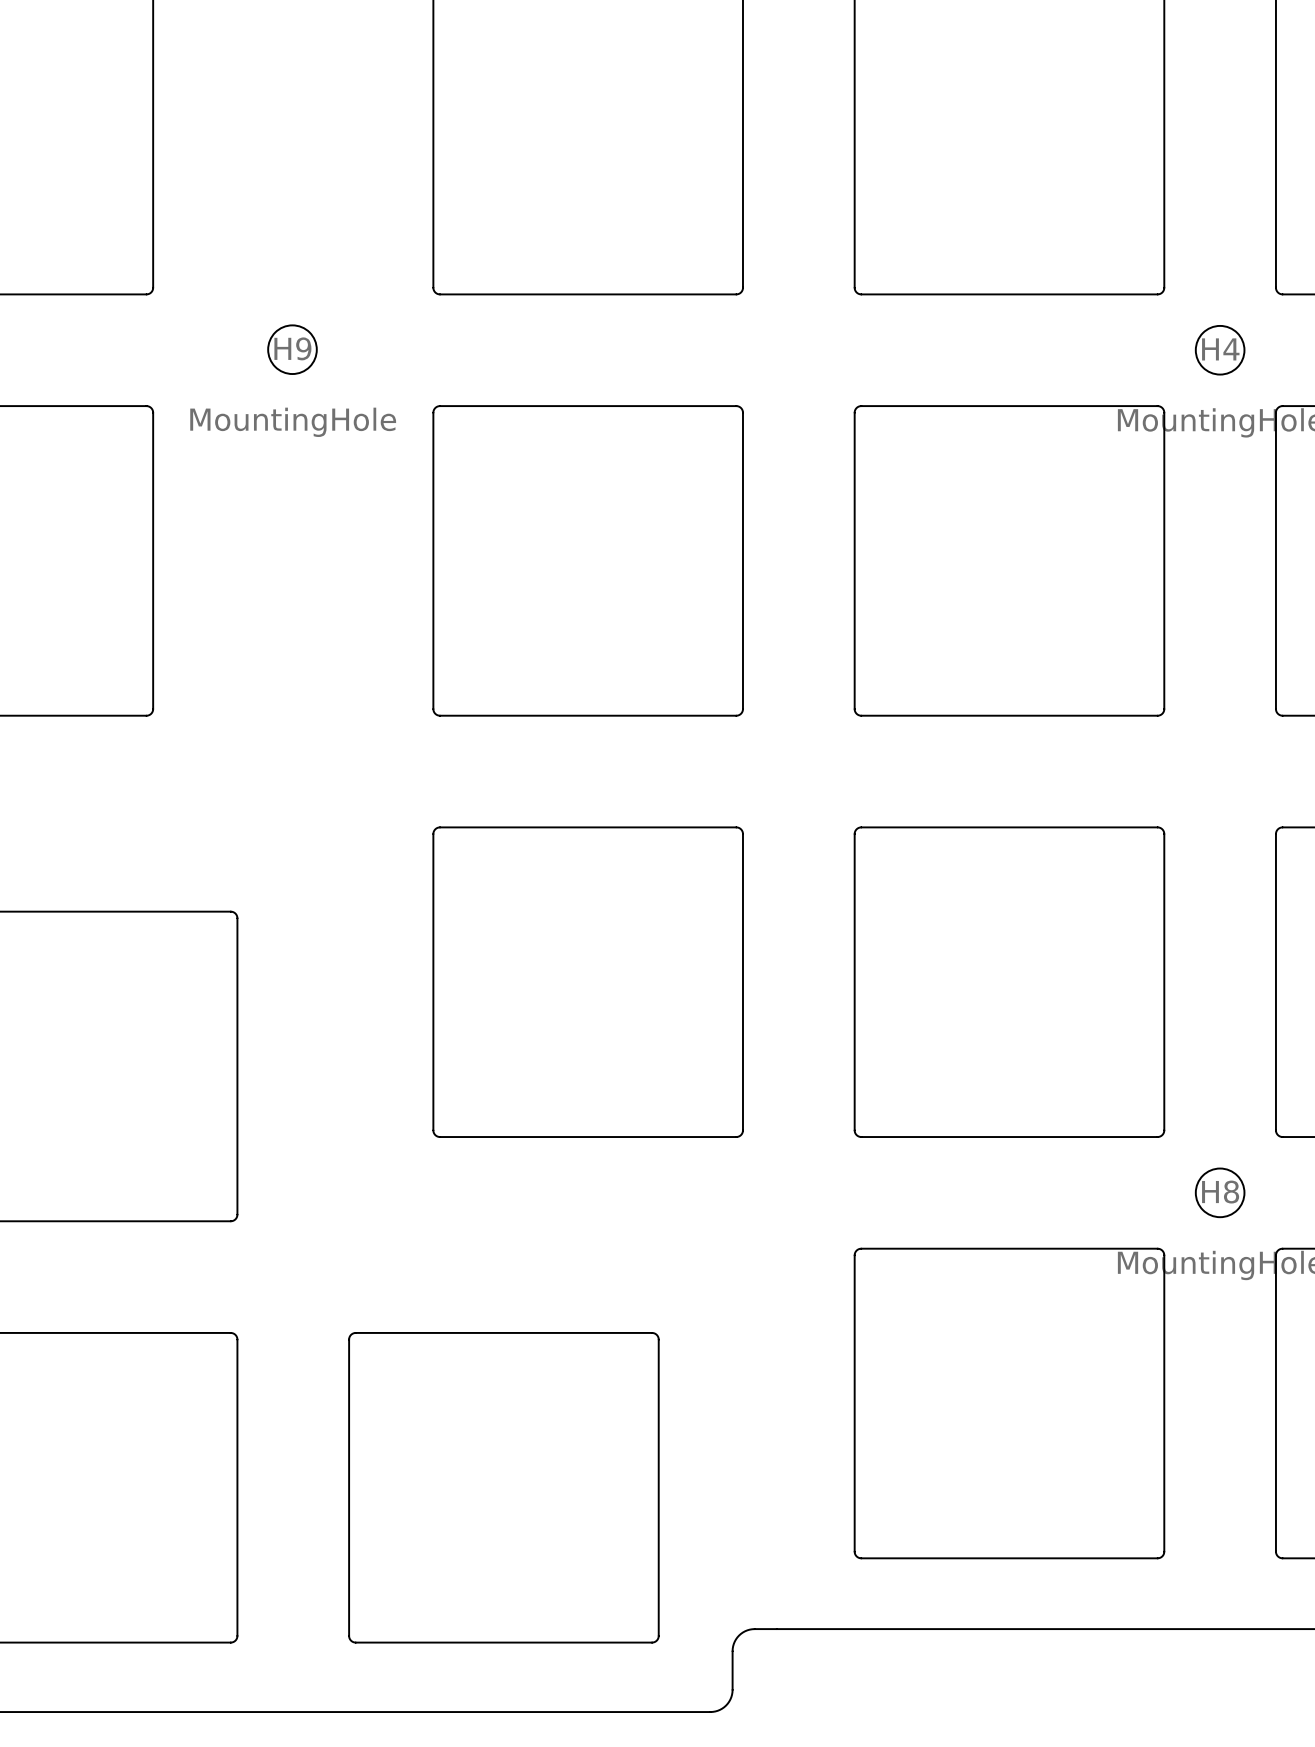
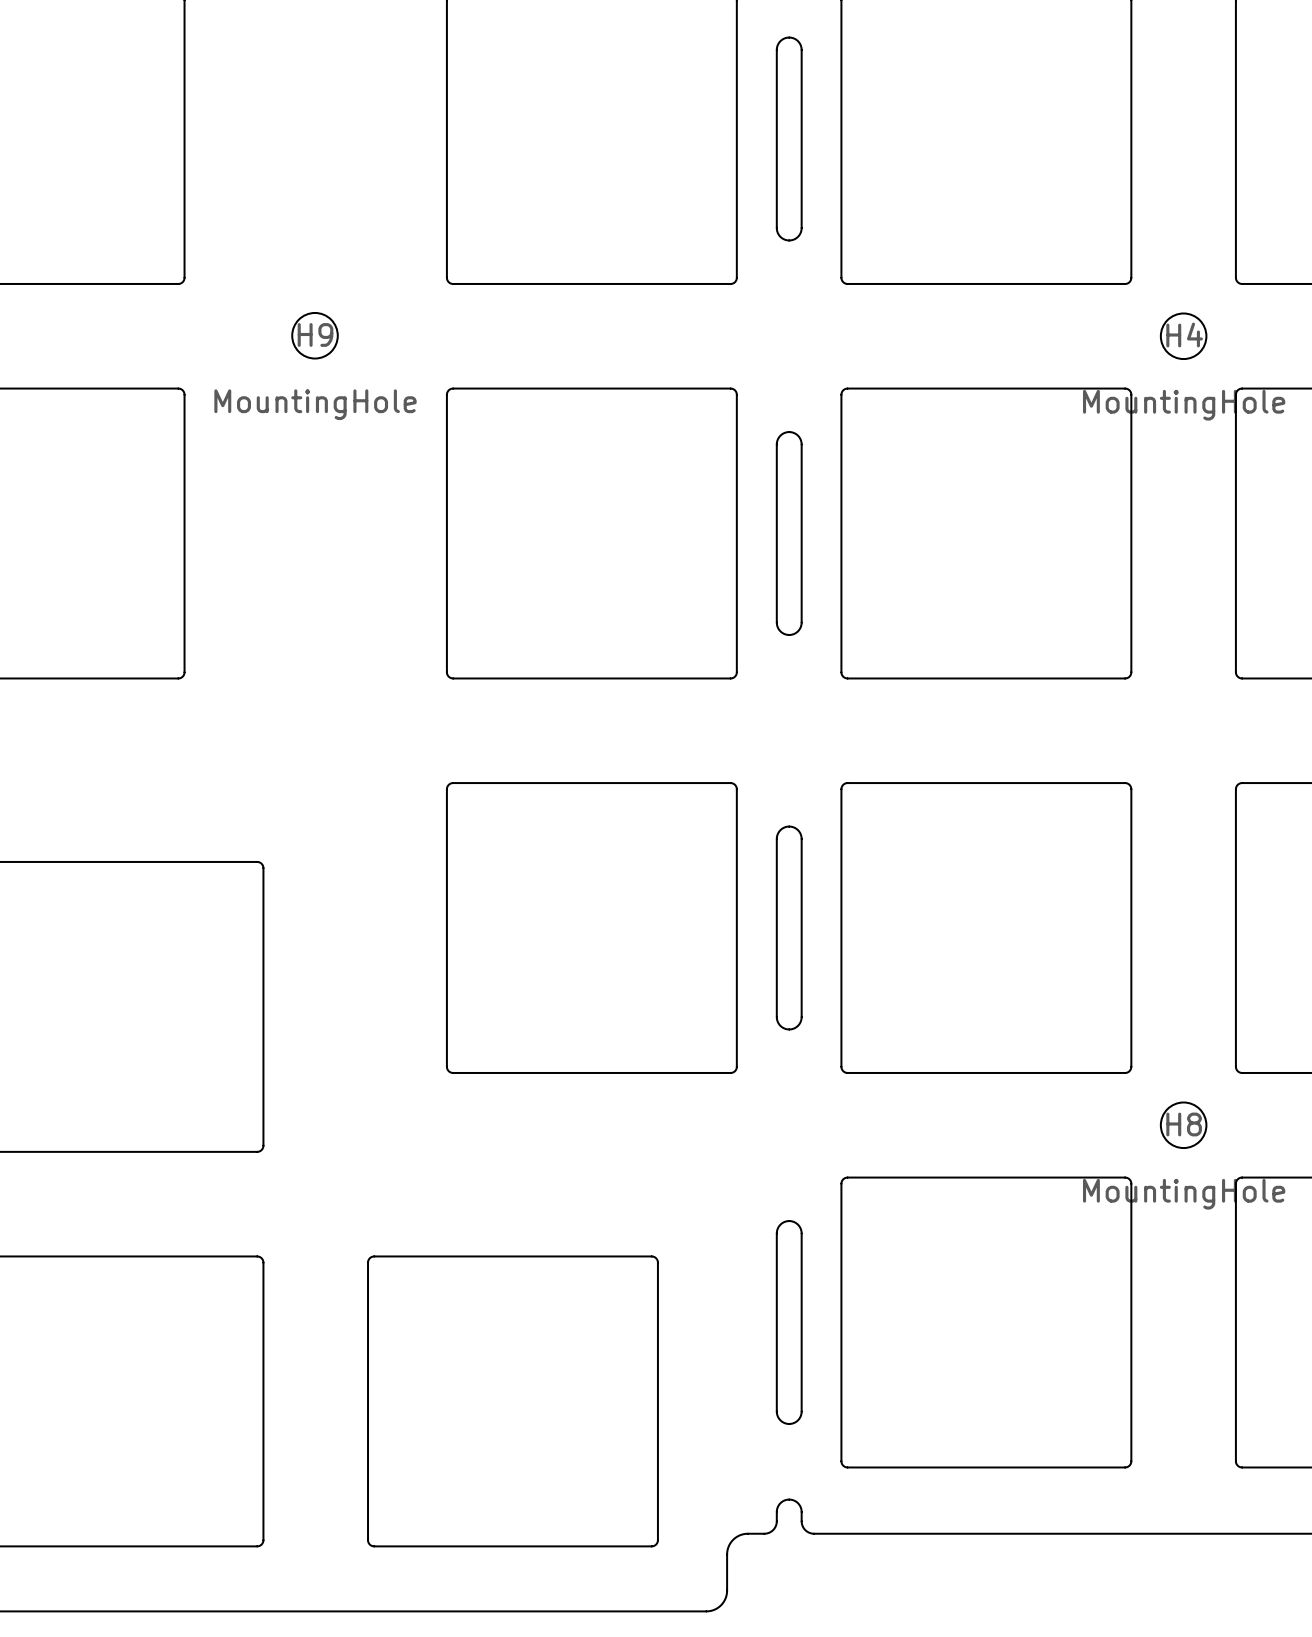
board edge: none -> (789, 37) (798, 41) (801, 49) (801, 228) (798, 236) (789, 240) (780, 236) (776, 228) (776, 49) (780, 41) (789, 37)
board edge: none -> (789, 432) (798, 435) (801, 444) (801, 622) (798, 631) (789, 634) (780, 631) (776, 622) (776, 444) (780, 435) (789, 432)
board edge: none -> (789, 826) (780, 830) (776, 838) (776, 1017) (780, 1025) (789, 1029) (798, 1025) (801, 1017) (801, 838) (798, 830) (789, 826)
board edge: none -> (789, 1221) (780, 1224) (776, 1233) (776, 1411) (780, 1420) (789, 1423) (798, 1420) (801, 1411) (801, 1233) (798, 1224) (789, 1221)
board edge: (772, 1629) (825, 1629) -> (764, 1533) (770, 1532) (775, 1527) (779, 1504) (789, 1499) (795, 1501) (799, 1505) (804, 1528) (814, 1533)

